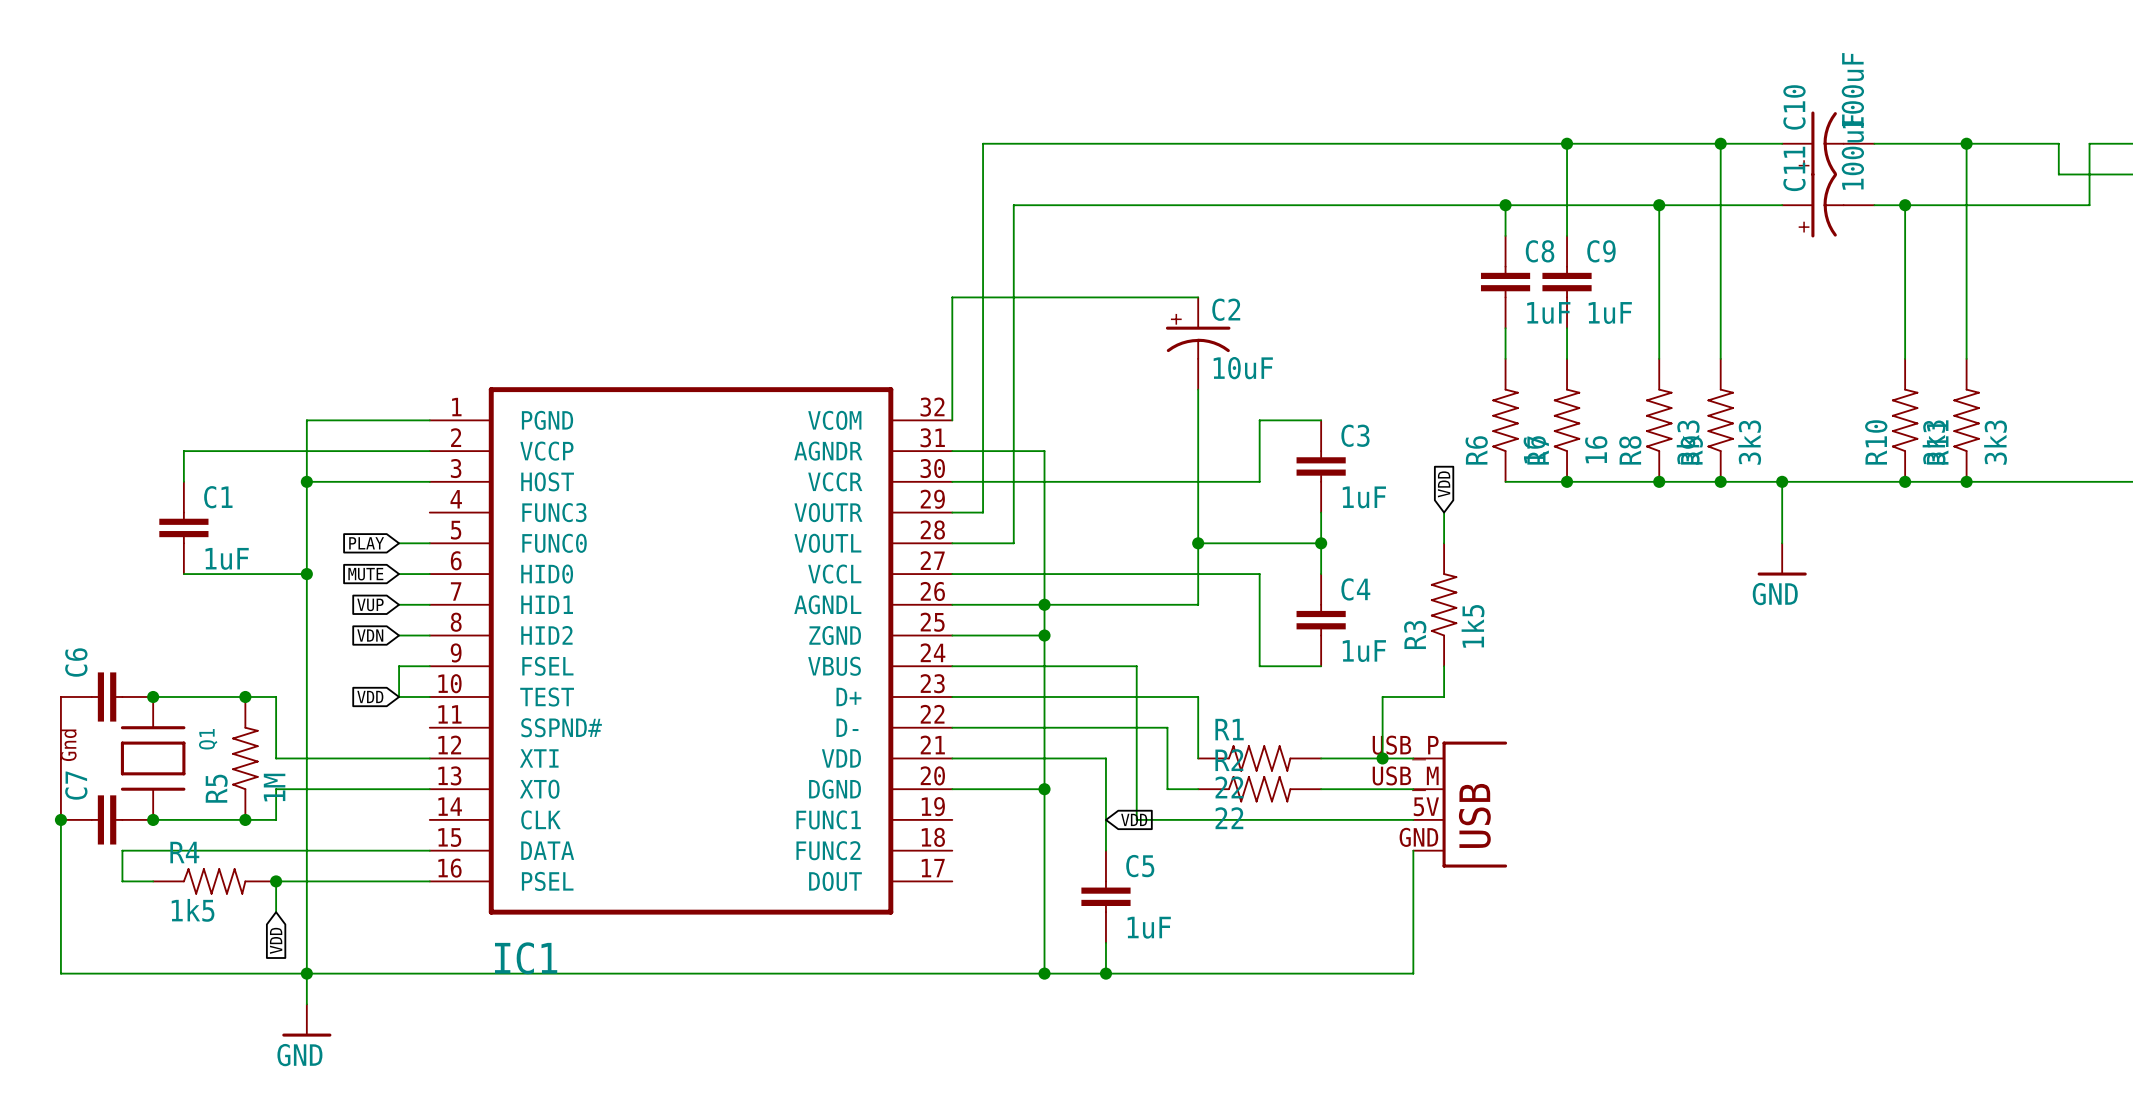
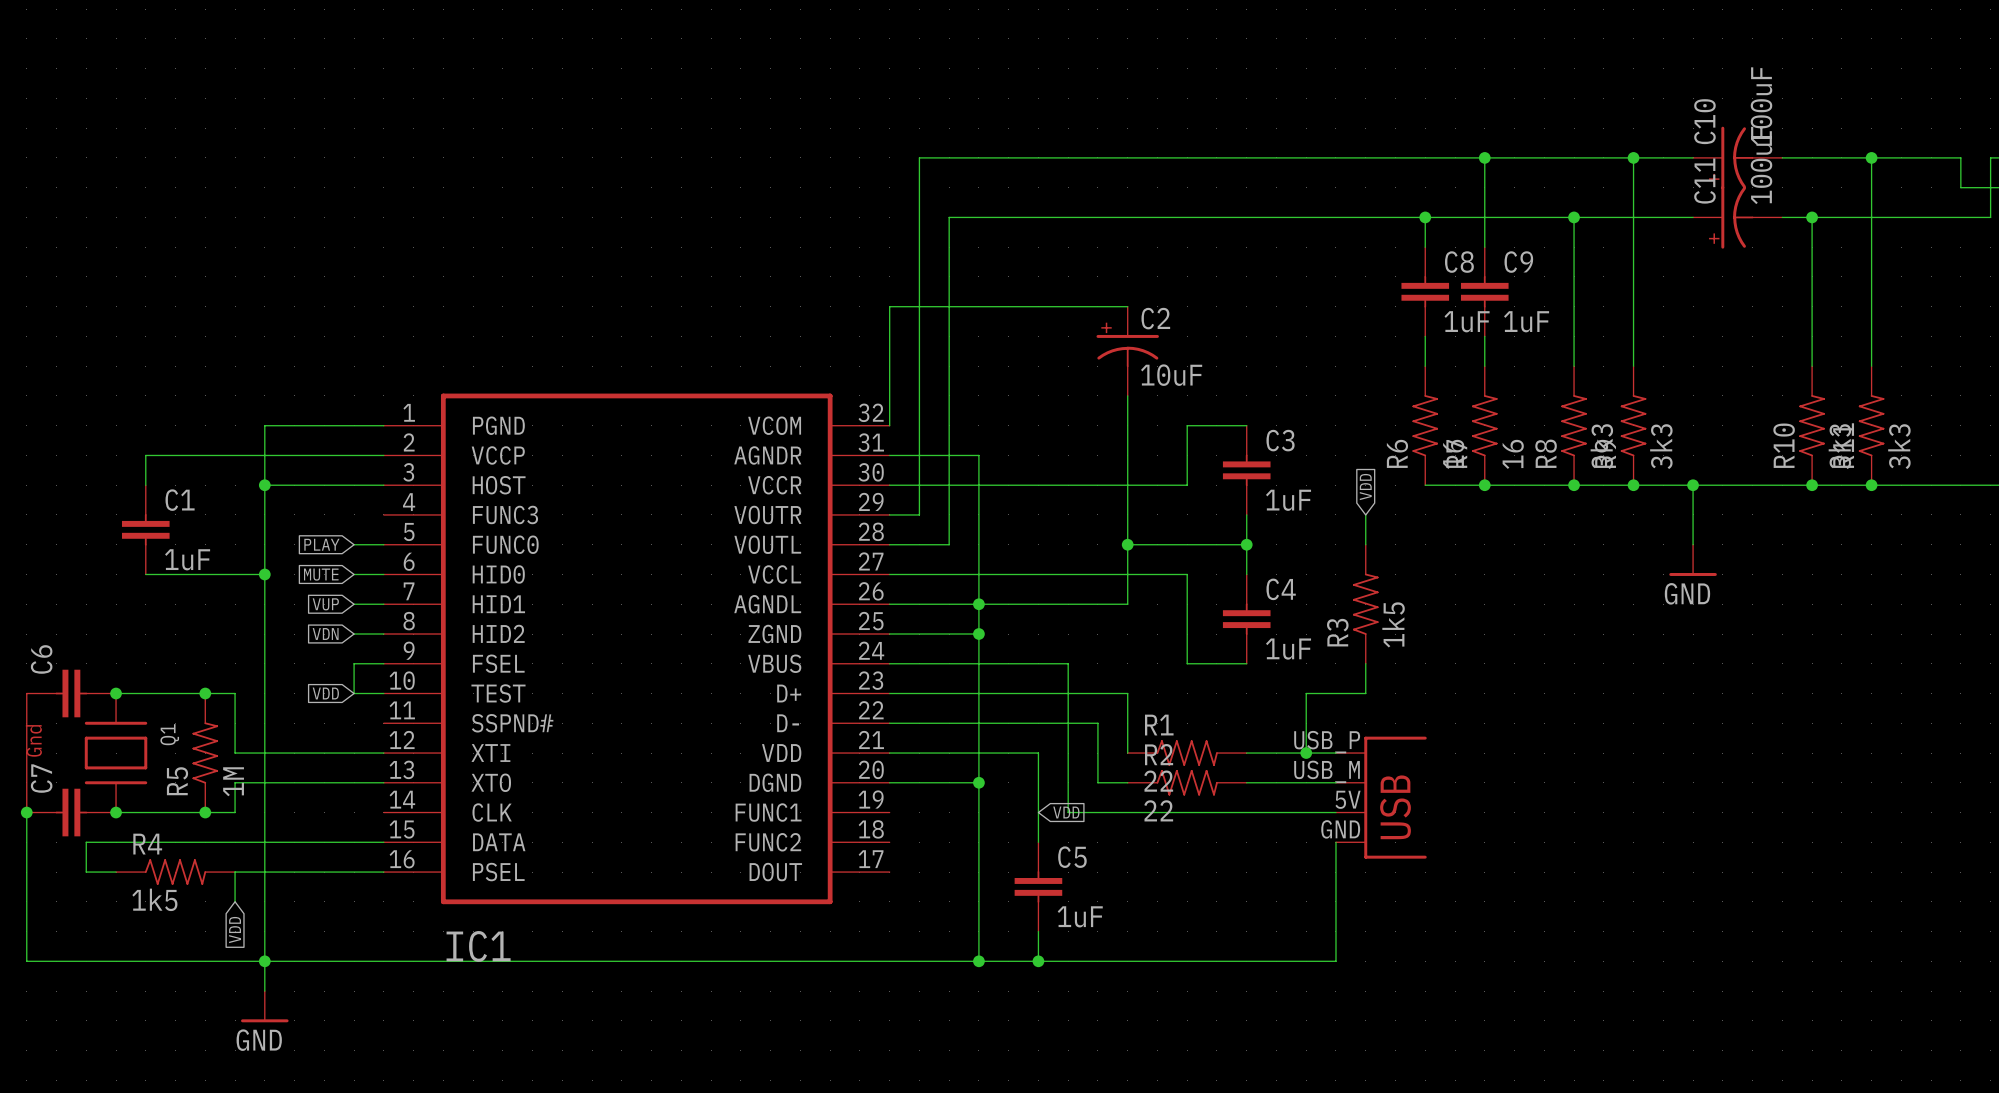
junction: (276, 881) -> none

